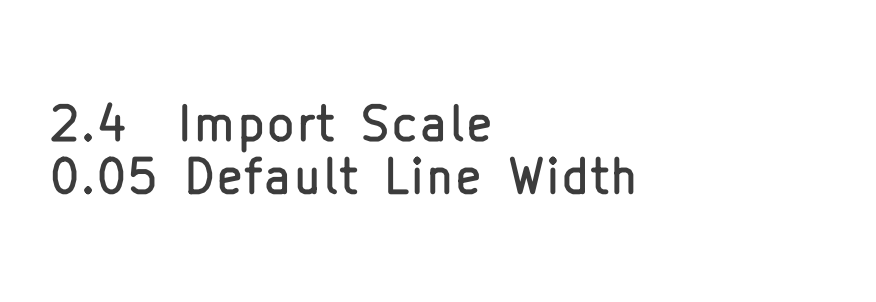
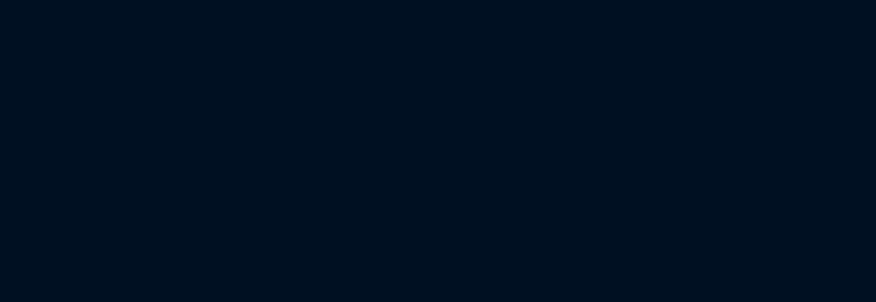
text: 2.4 Import Scale (270, 127) -> none
text: 0.05 Default Line Width (343, 175) -> none

